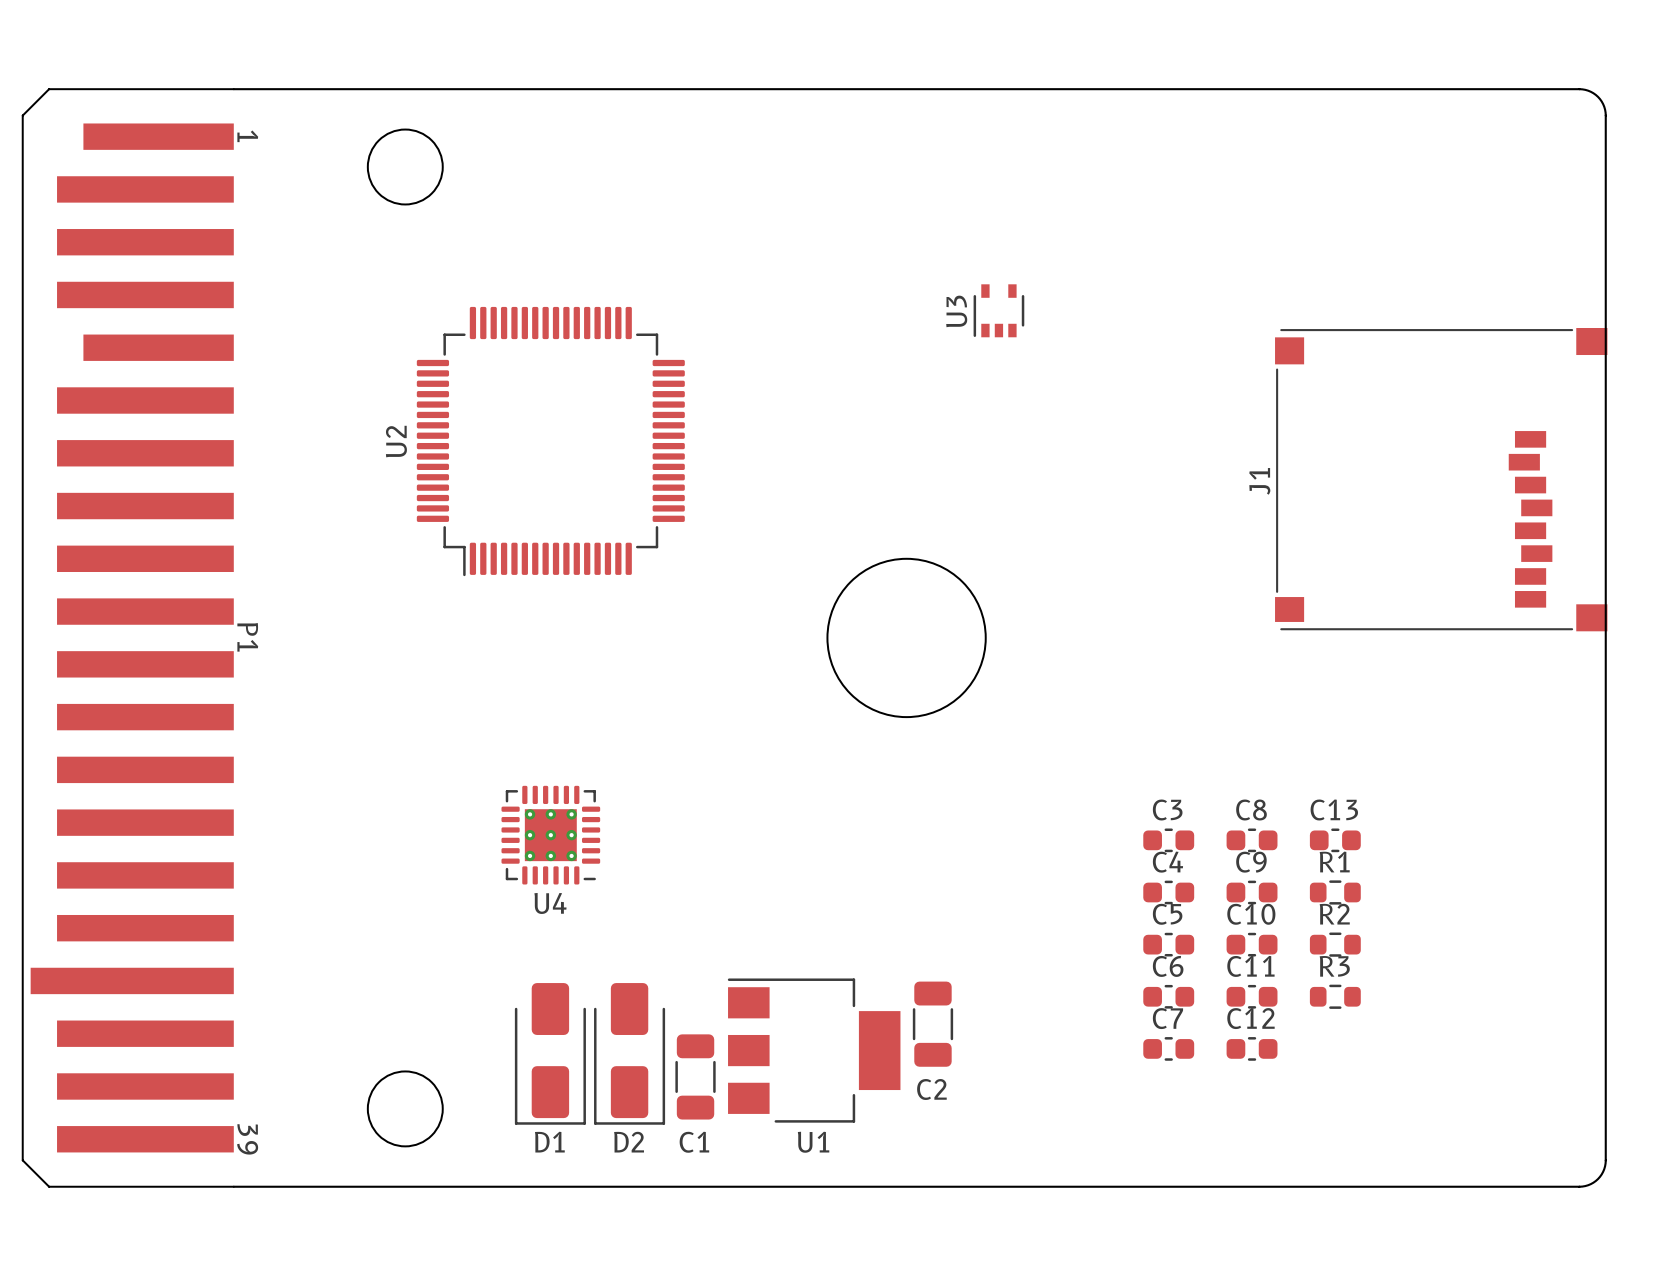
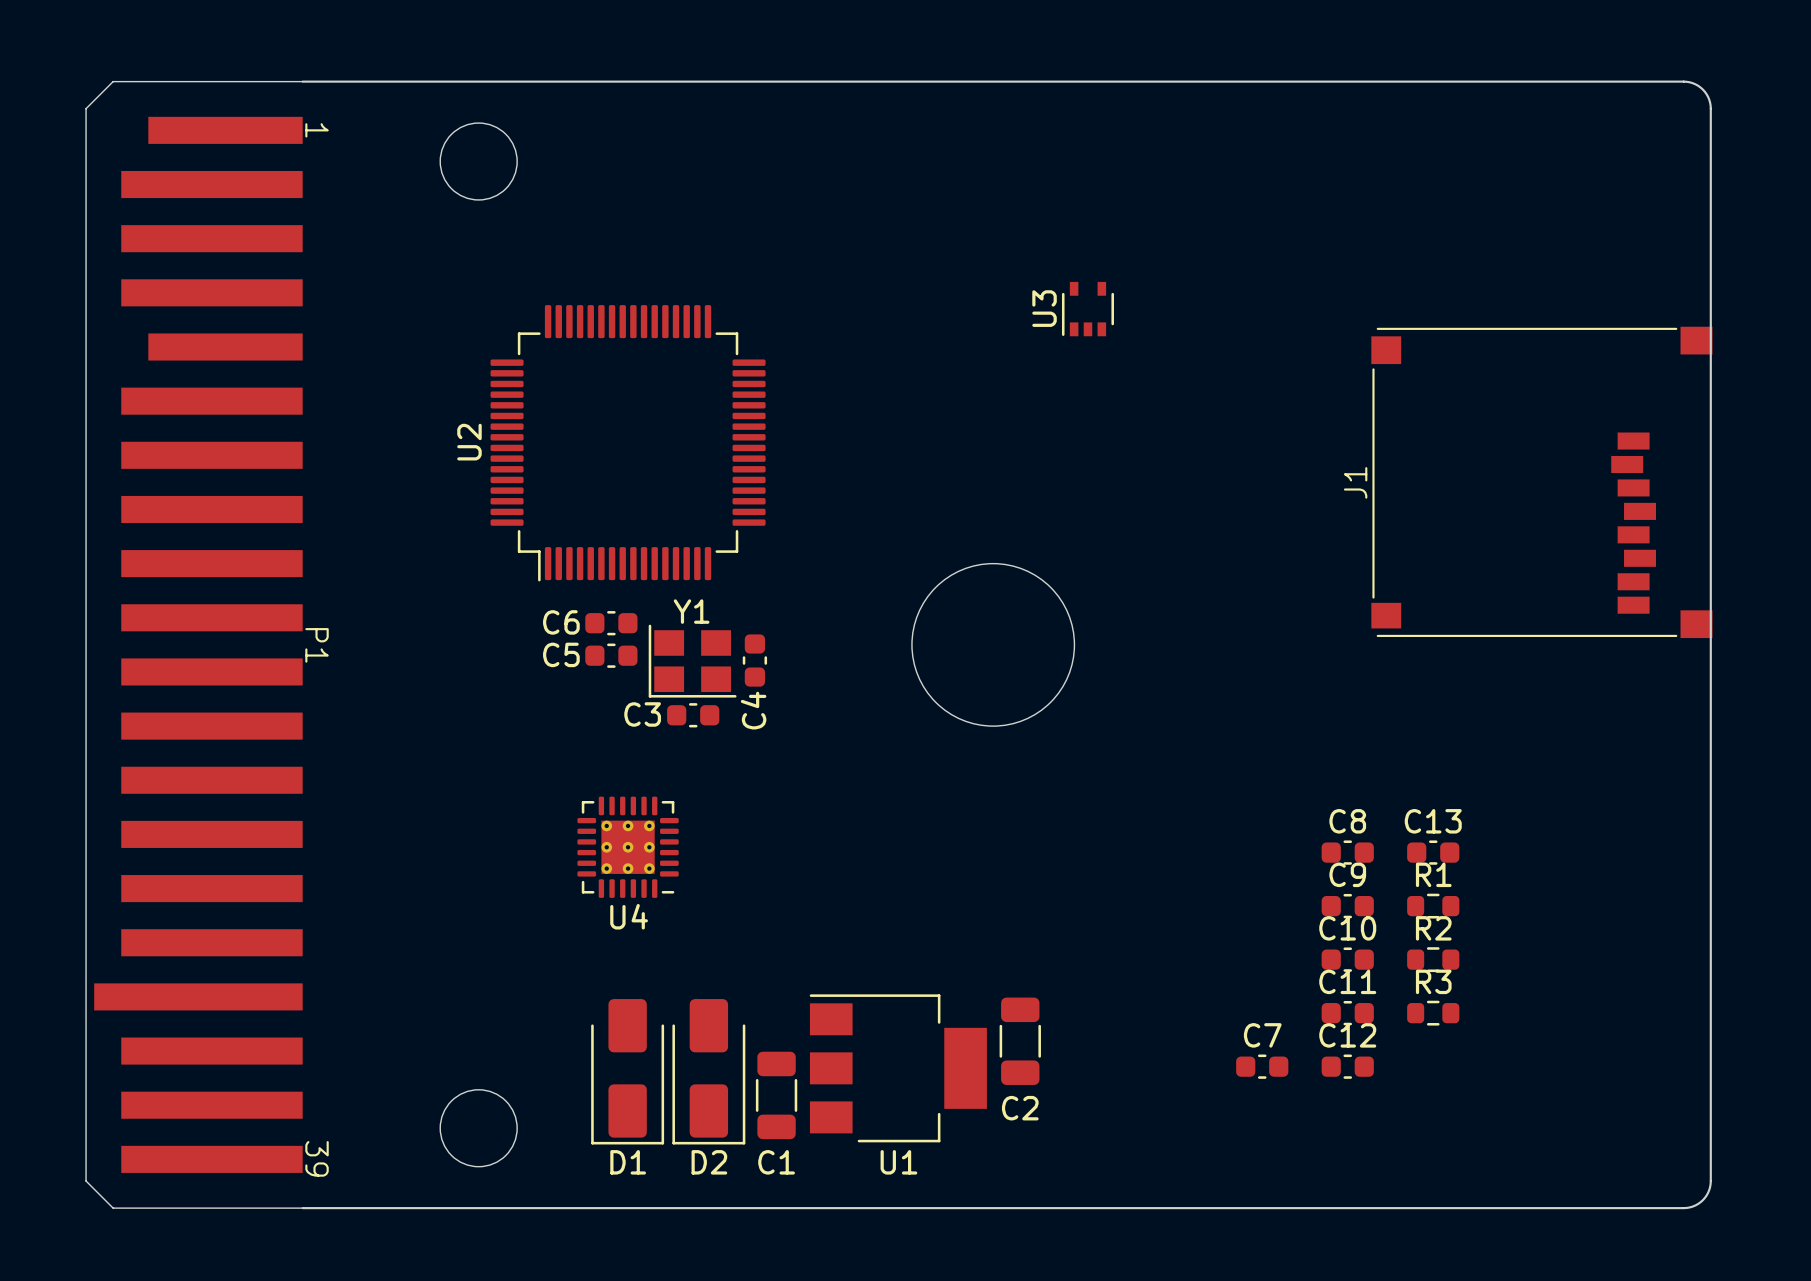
Y1: none -> (692, 661)
C3 name position: C3 (1167, 809) -> C3 (642, 714)
C3 position: (1168, 840) -> (693, 715)
C4 name position: C4 (1167, 862) -> C4 (753, 710)
C4 rotation: 0° (1168, 892) -> 90° clockwise (754, 660)
C4 position: (1168, 892) -> (754, 660)
C5 name position: C5 (1167, 914) -> C5 (561, 654)
C5 position: (1168, 944) -> (611, 655)
C6 name position: C6 (1168, 966) -> C6 (561, 622)
C6 position: (1168, 996) -> (611, 623)

